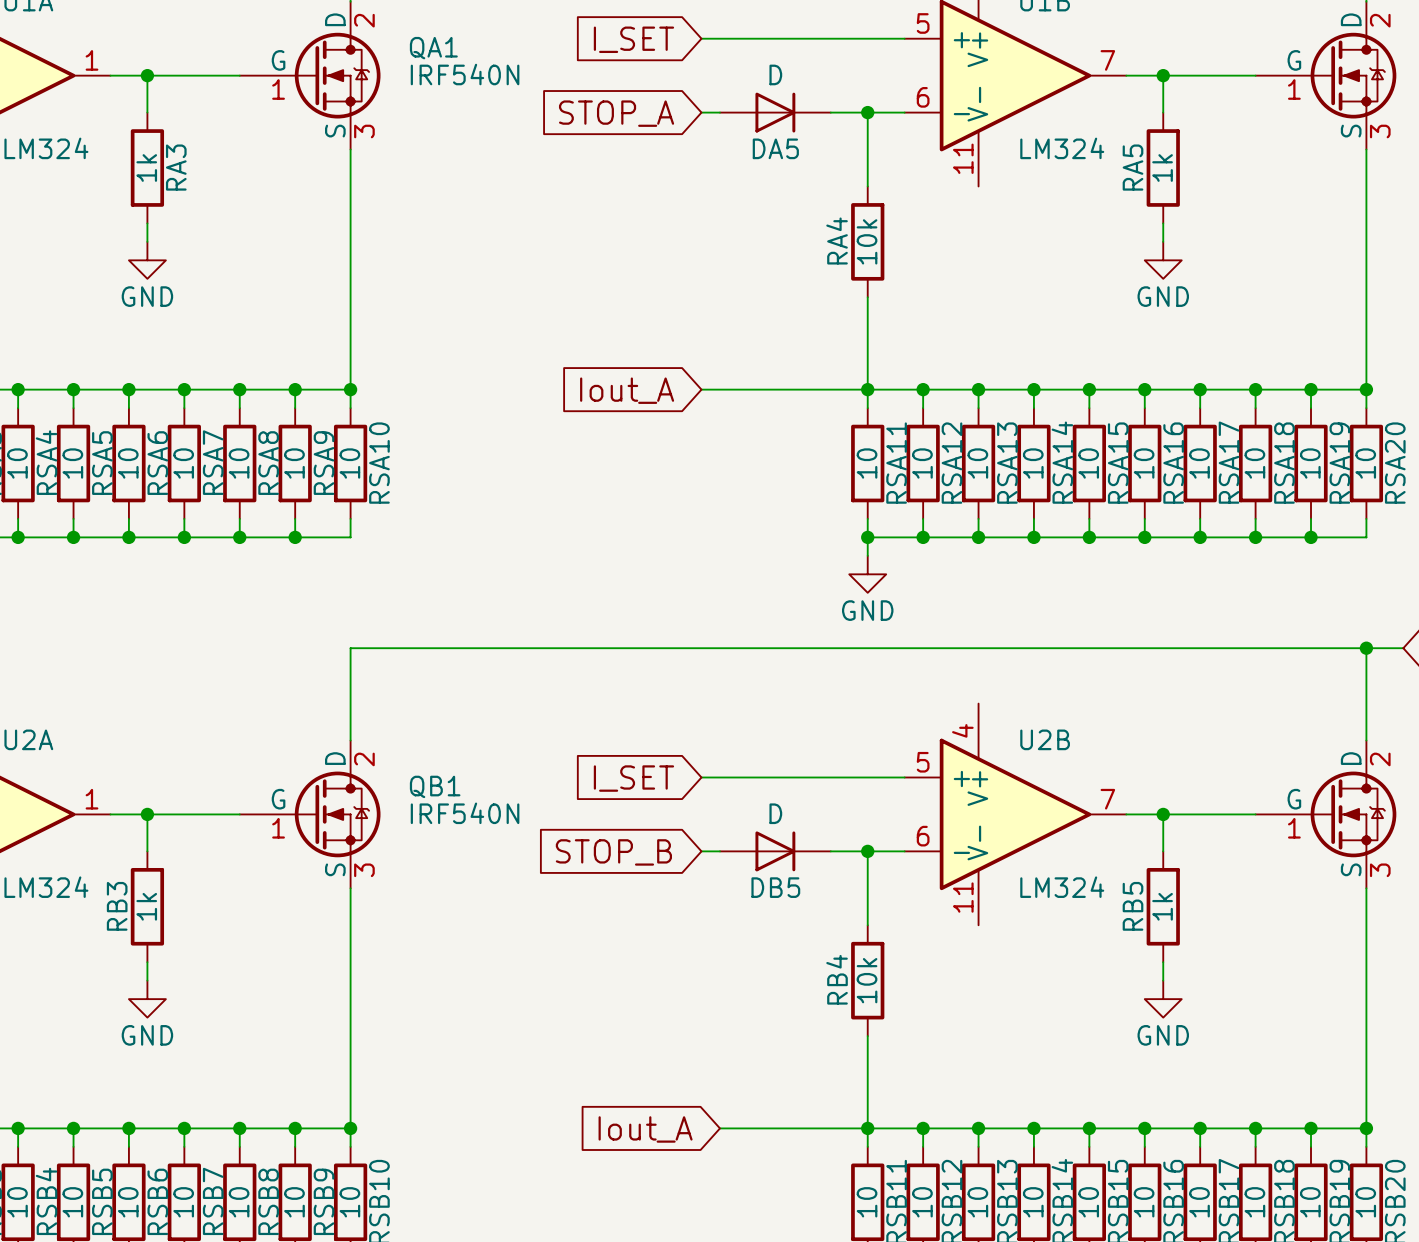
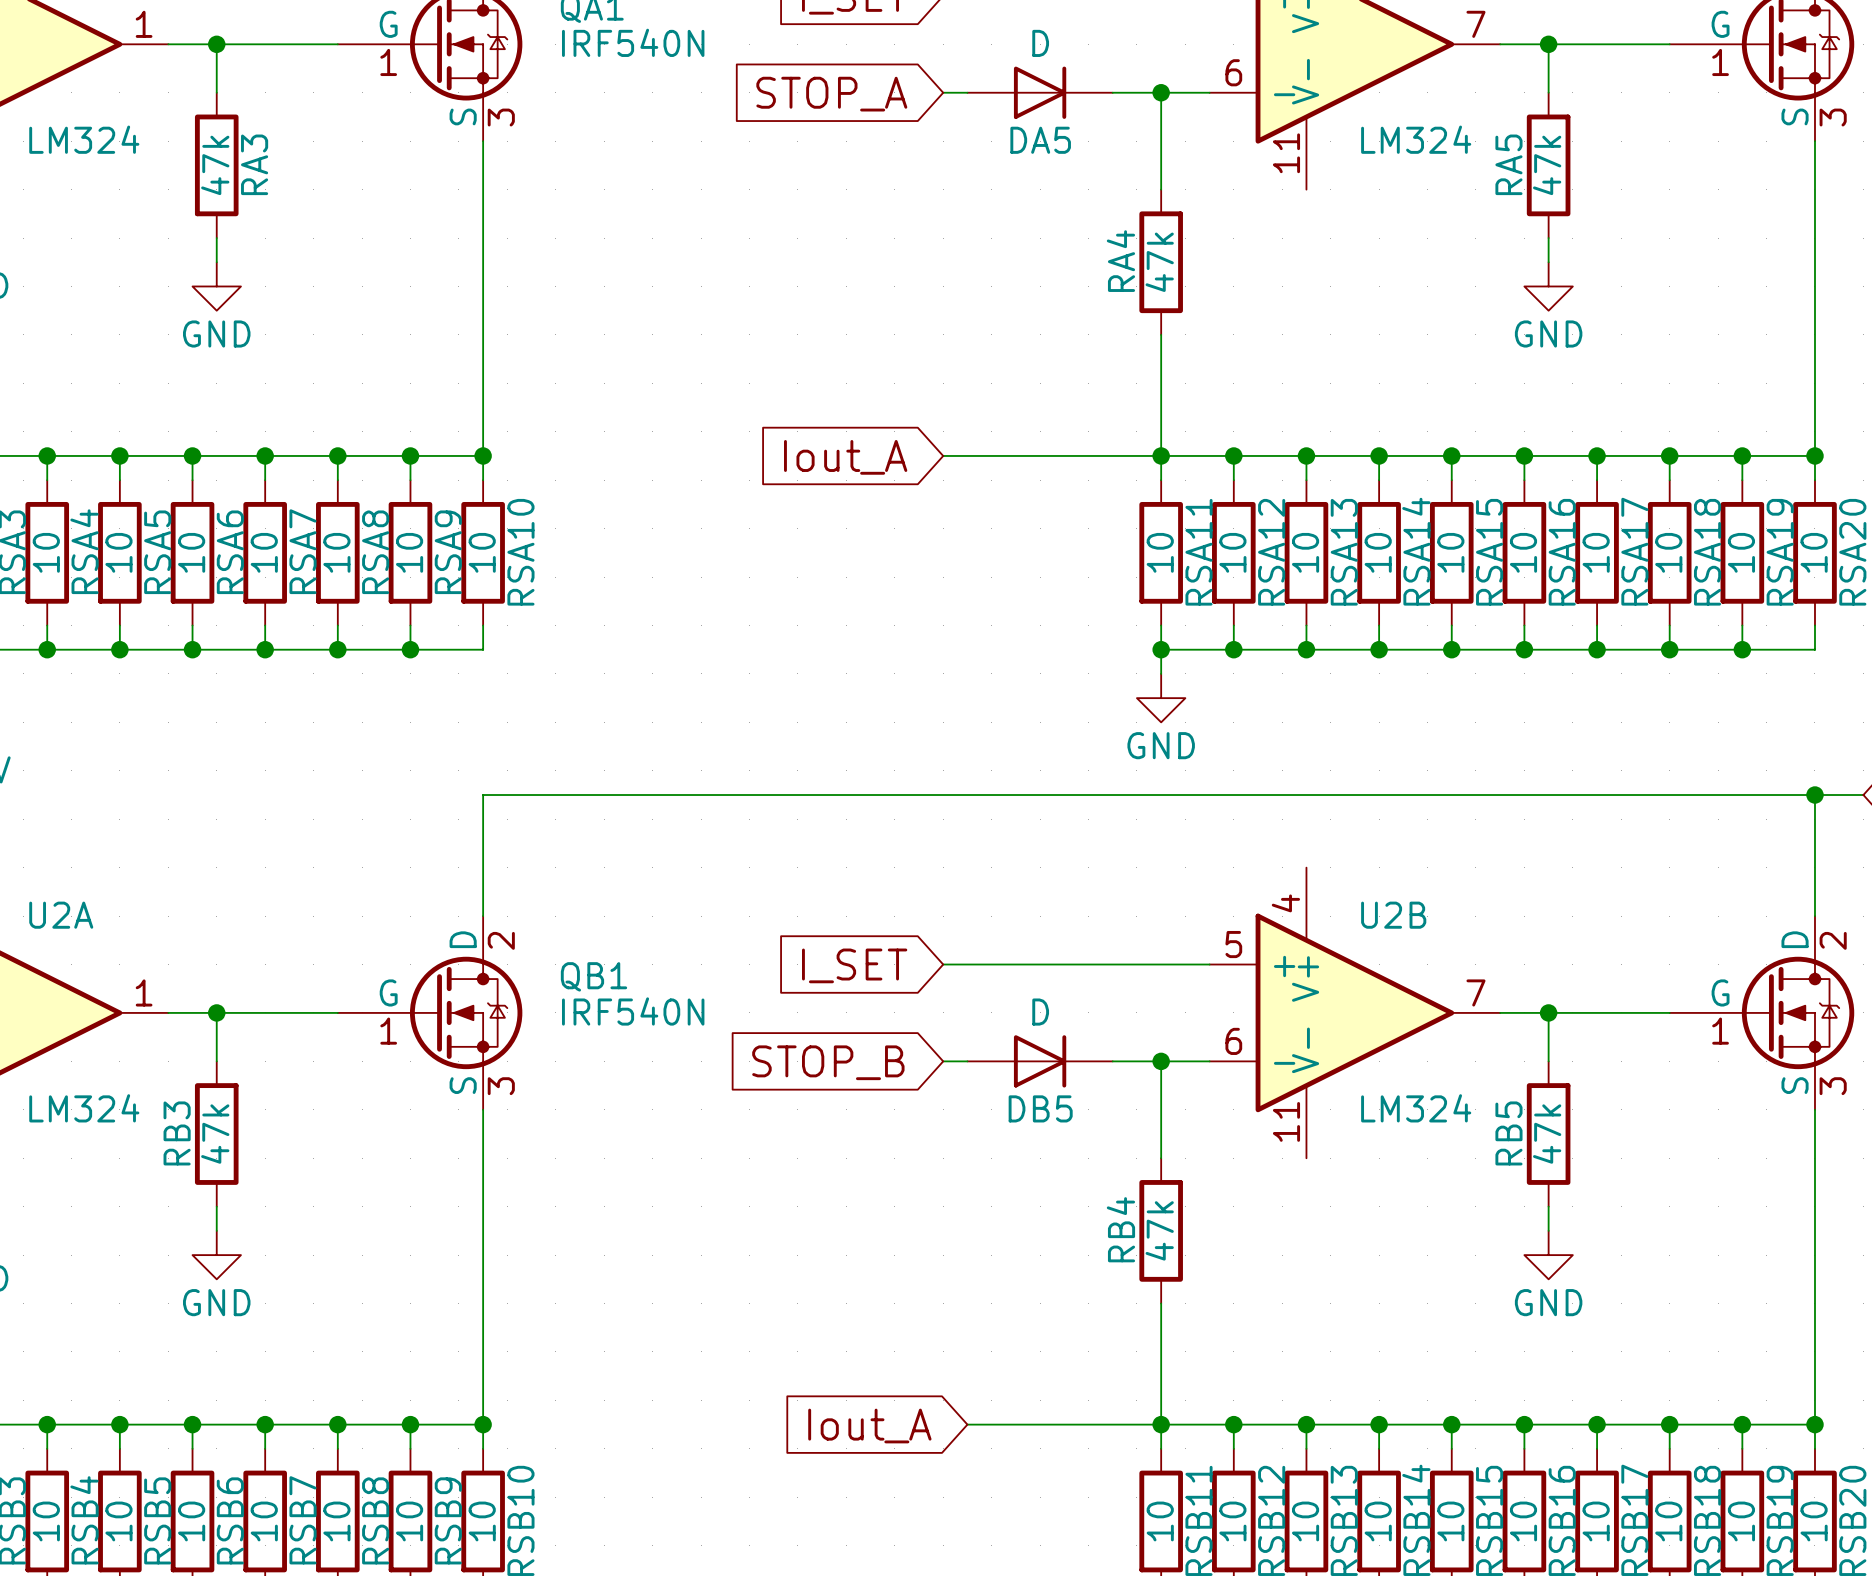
RA3 value: 1k (146, 167) -> 47k (215, 165)
RA5 value: 1k (1162, 167) -> 47k (1547, 165)
RA4 value: 10k (867, 241) -> 47k (1159, 262)
RB3 value: 1k (146, 906) -> 47k (215, 1134)
RB5 value: 1k (1162, 906) -> 47k (1547, 1134)
RB4 value: 10k (867, 980) -> 47k (1159, 1230)

